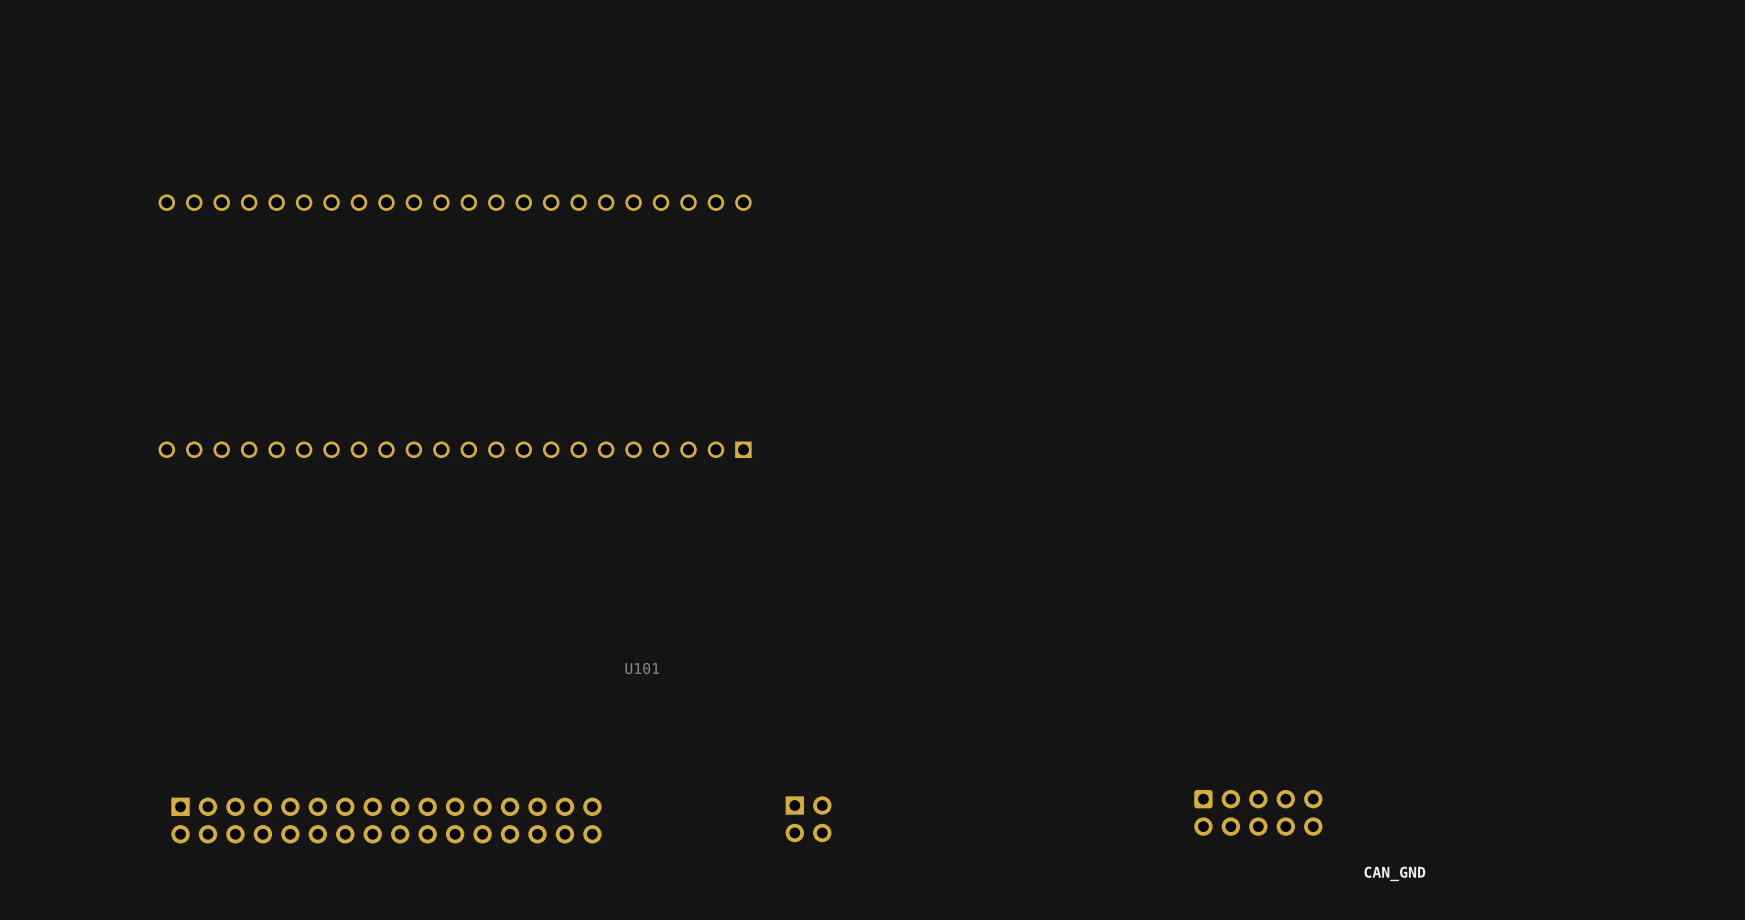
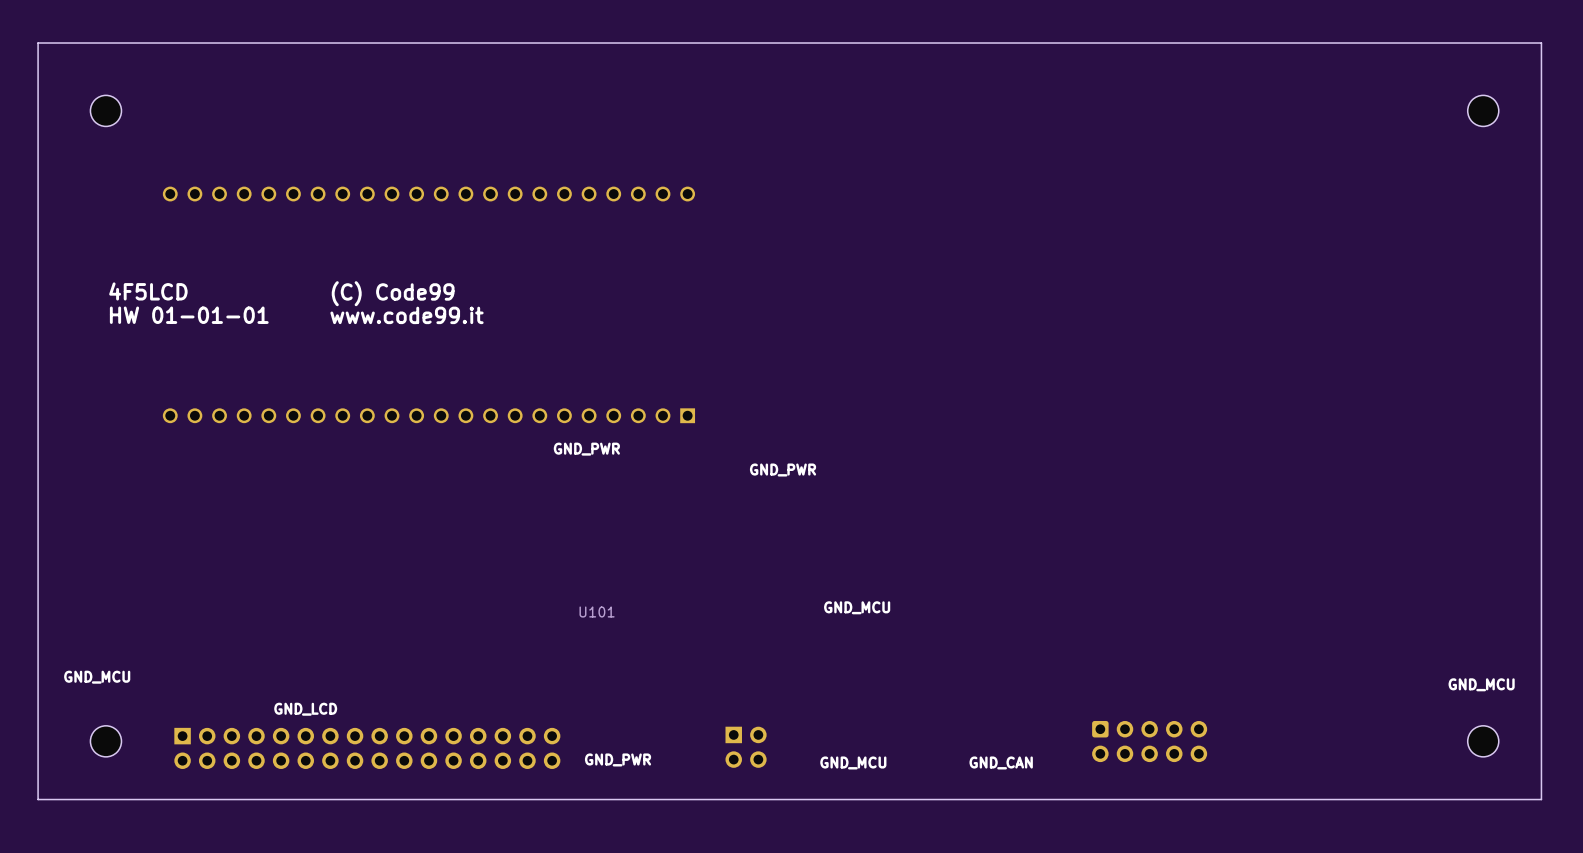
board edge: none -> (1541, 43) (38, 43) (38, 799) (1541, 799) (1541, 43)
part: none -> (105, 110)
part: none -> (1483, 110)
text: none -> 4F5LCD (148, 291)
text: none -> (C) Code99 (393, 293)
text: none -> HW 01-01-01 (189, 315)
text: none -> www.code99.it (406, 315)
text: none -> GND_PWR (586, 449)
text: none -> GND_PWR (783, 470)
text: none -> GND_MCU (857, 607)
text: none -> GND_MCU (97, 677)
text: none -> GND_MCU (1481, 684)
text: none -> GND_LCD (305, 709)
part: none -> (105, 741)
part: none -> (1483, 741)
text: none -> GND_PWR (618, 759)
text: none -> GND_MCU (853, 762)
text: none -> GND_CAN (1001, 762)
text: CAN_GND (1394, 873) -> none

